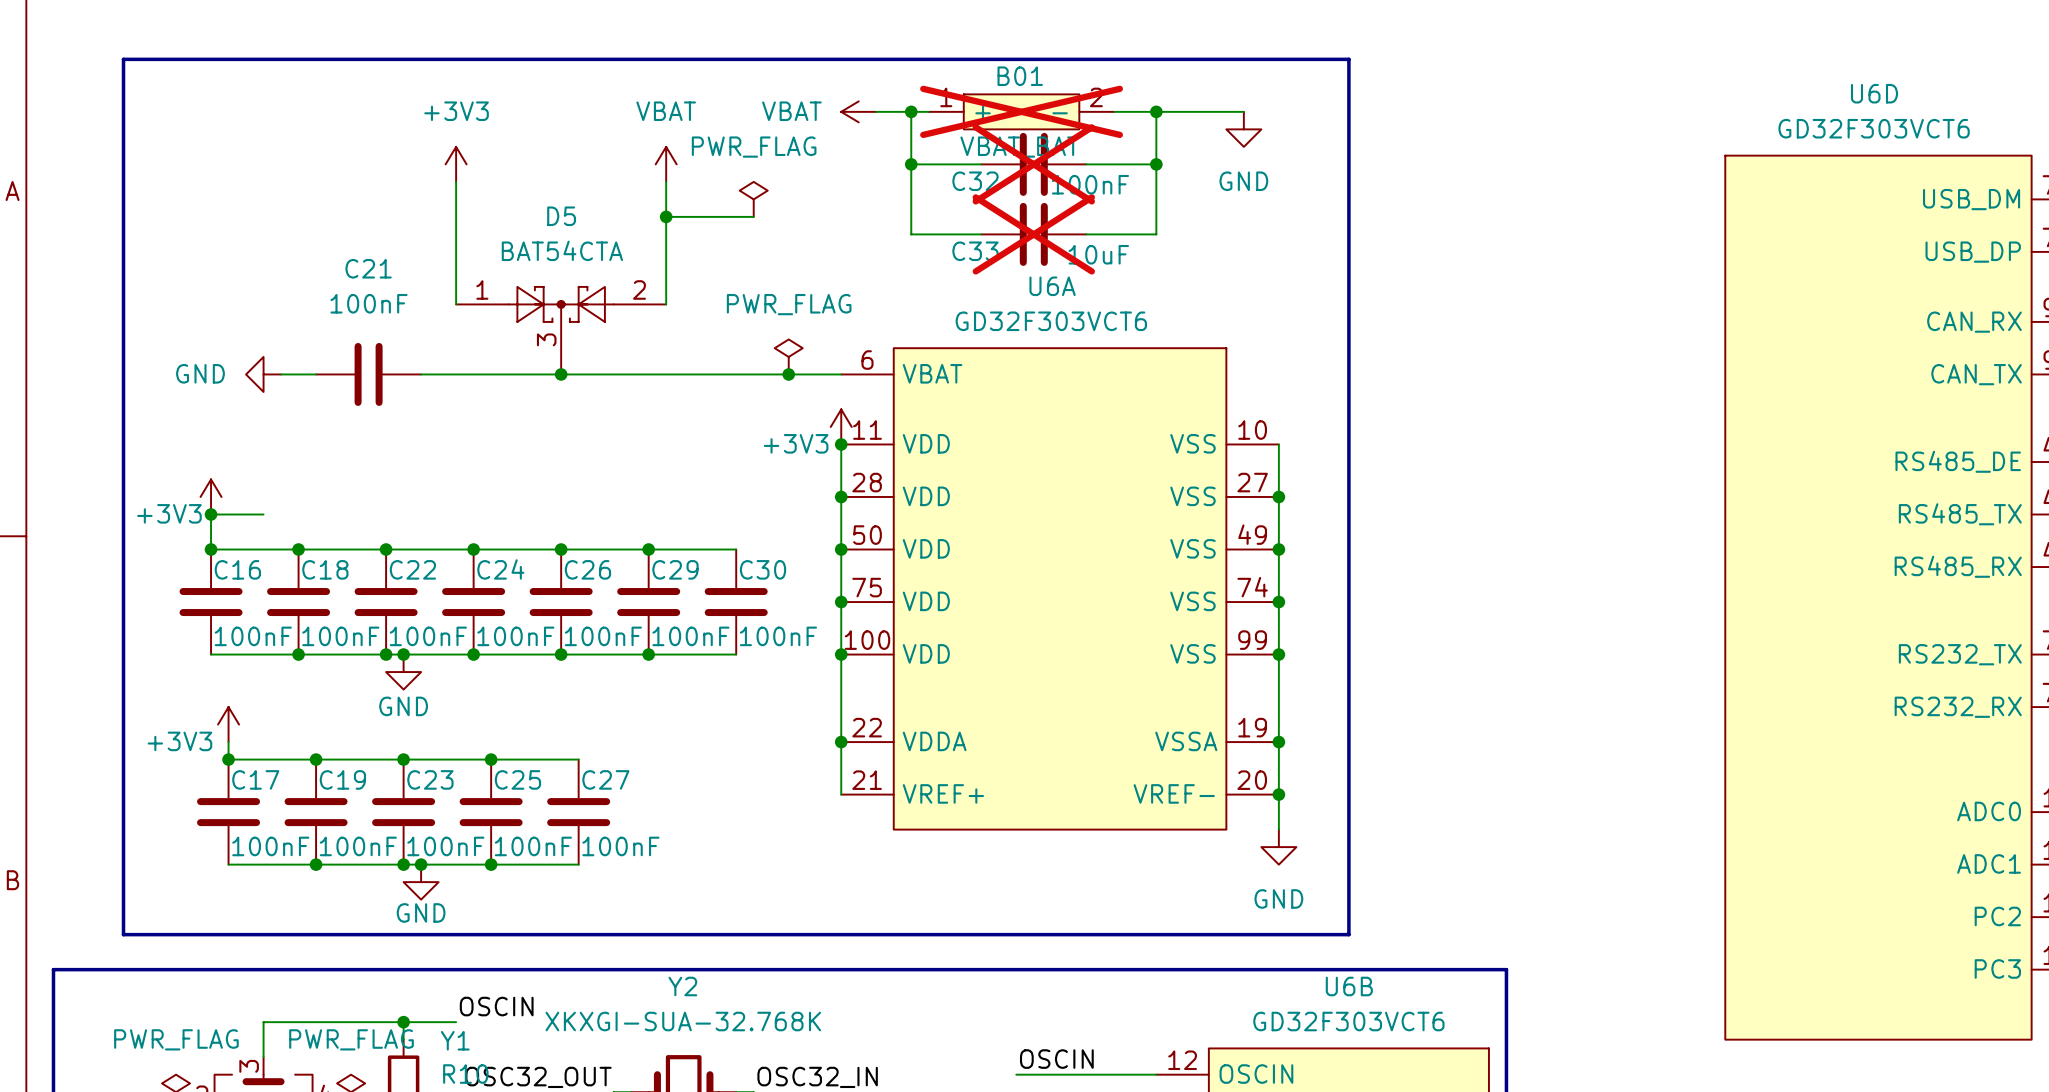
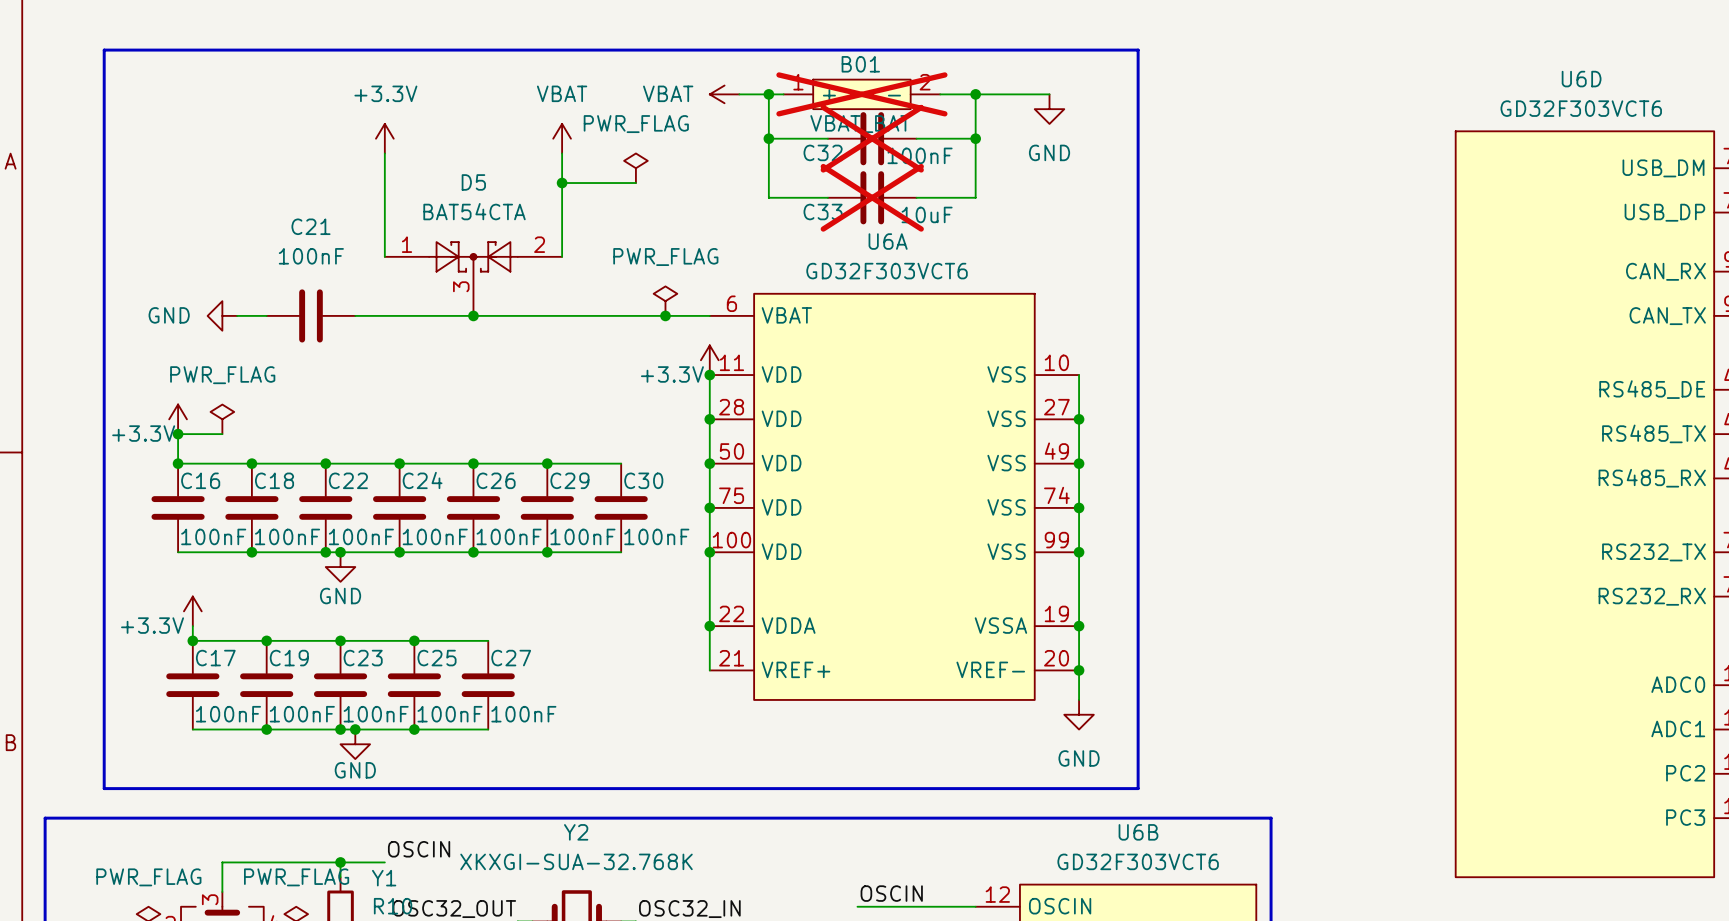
power symbol: +3V3 (456, 164) -> +3.3V (384, 138)
power symbol: +3V3 (841, 426) -> +3.3V (709, 360)
power symbol: +3V3 (211, 496) -> +3.3V (178, 419)
power symbol: none -> PWR_FLAG (222, 419)
power symbol: +3V3 (228, 724) -> +3.3V (192, 611)

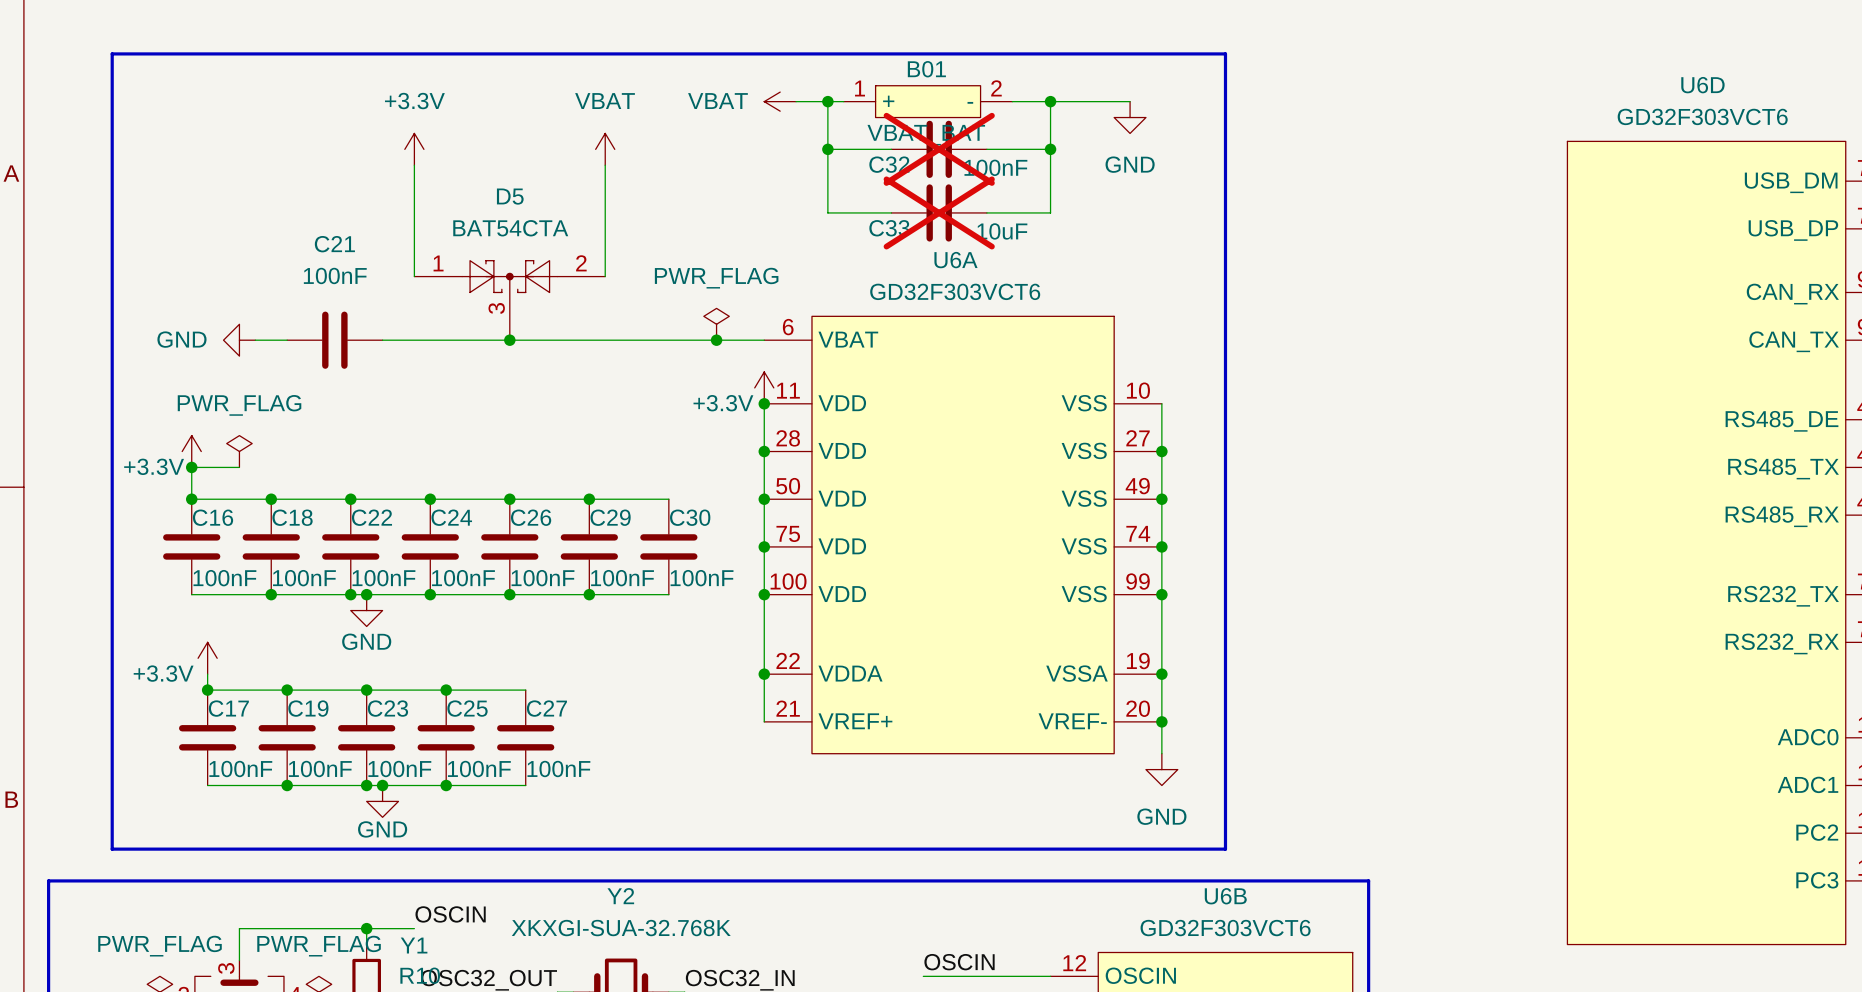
B01 do-not-place cross: (861, 94) -> none
power symbol: PWR_FLAG (635, 168) -> none
wire: (562, 183) (635, 183) -> none
junction: (562, 183) -> none

